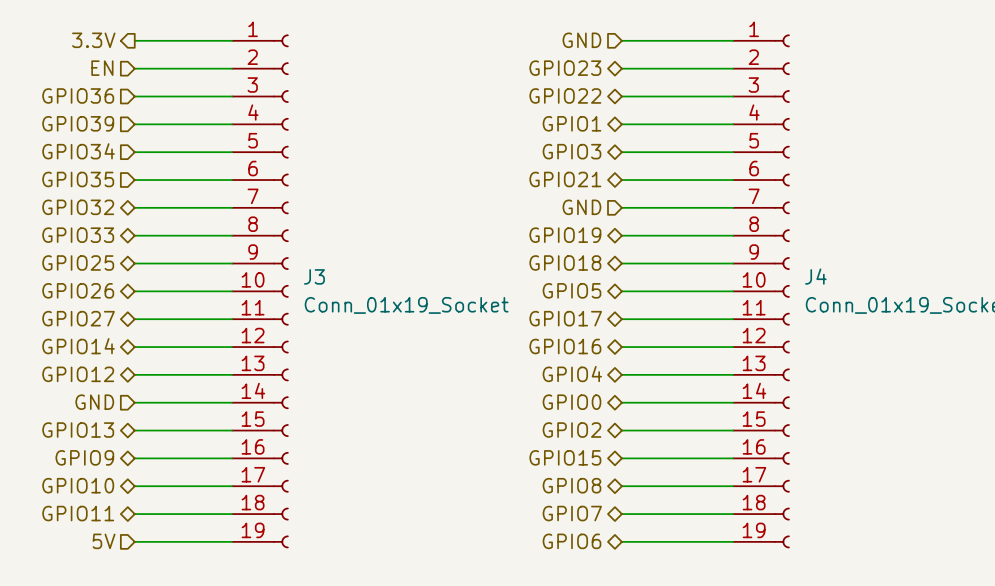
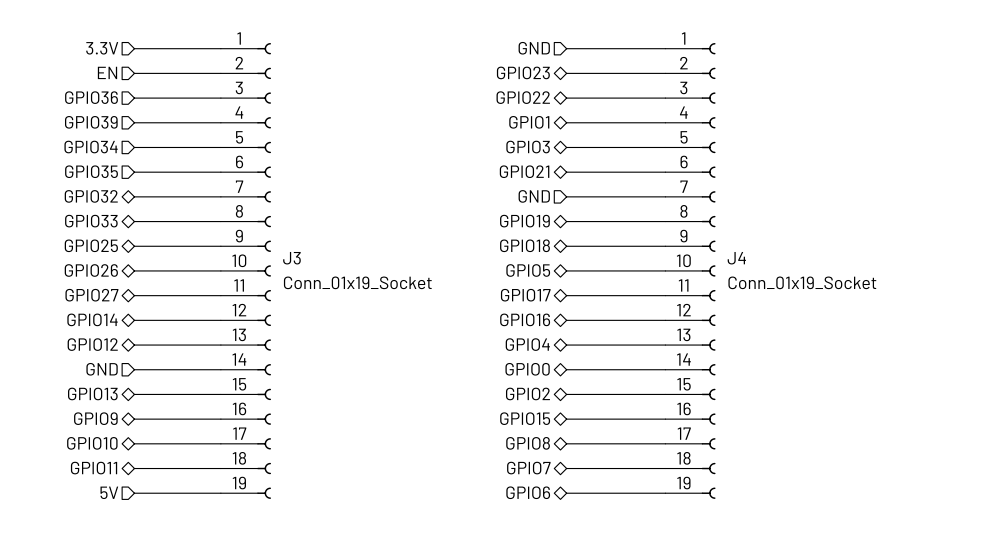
hierarchical label shape: output (93, 40) -> input (102, 48)

